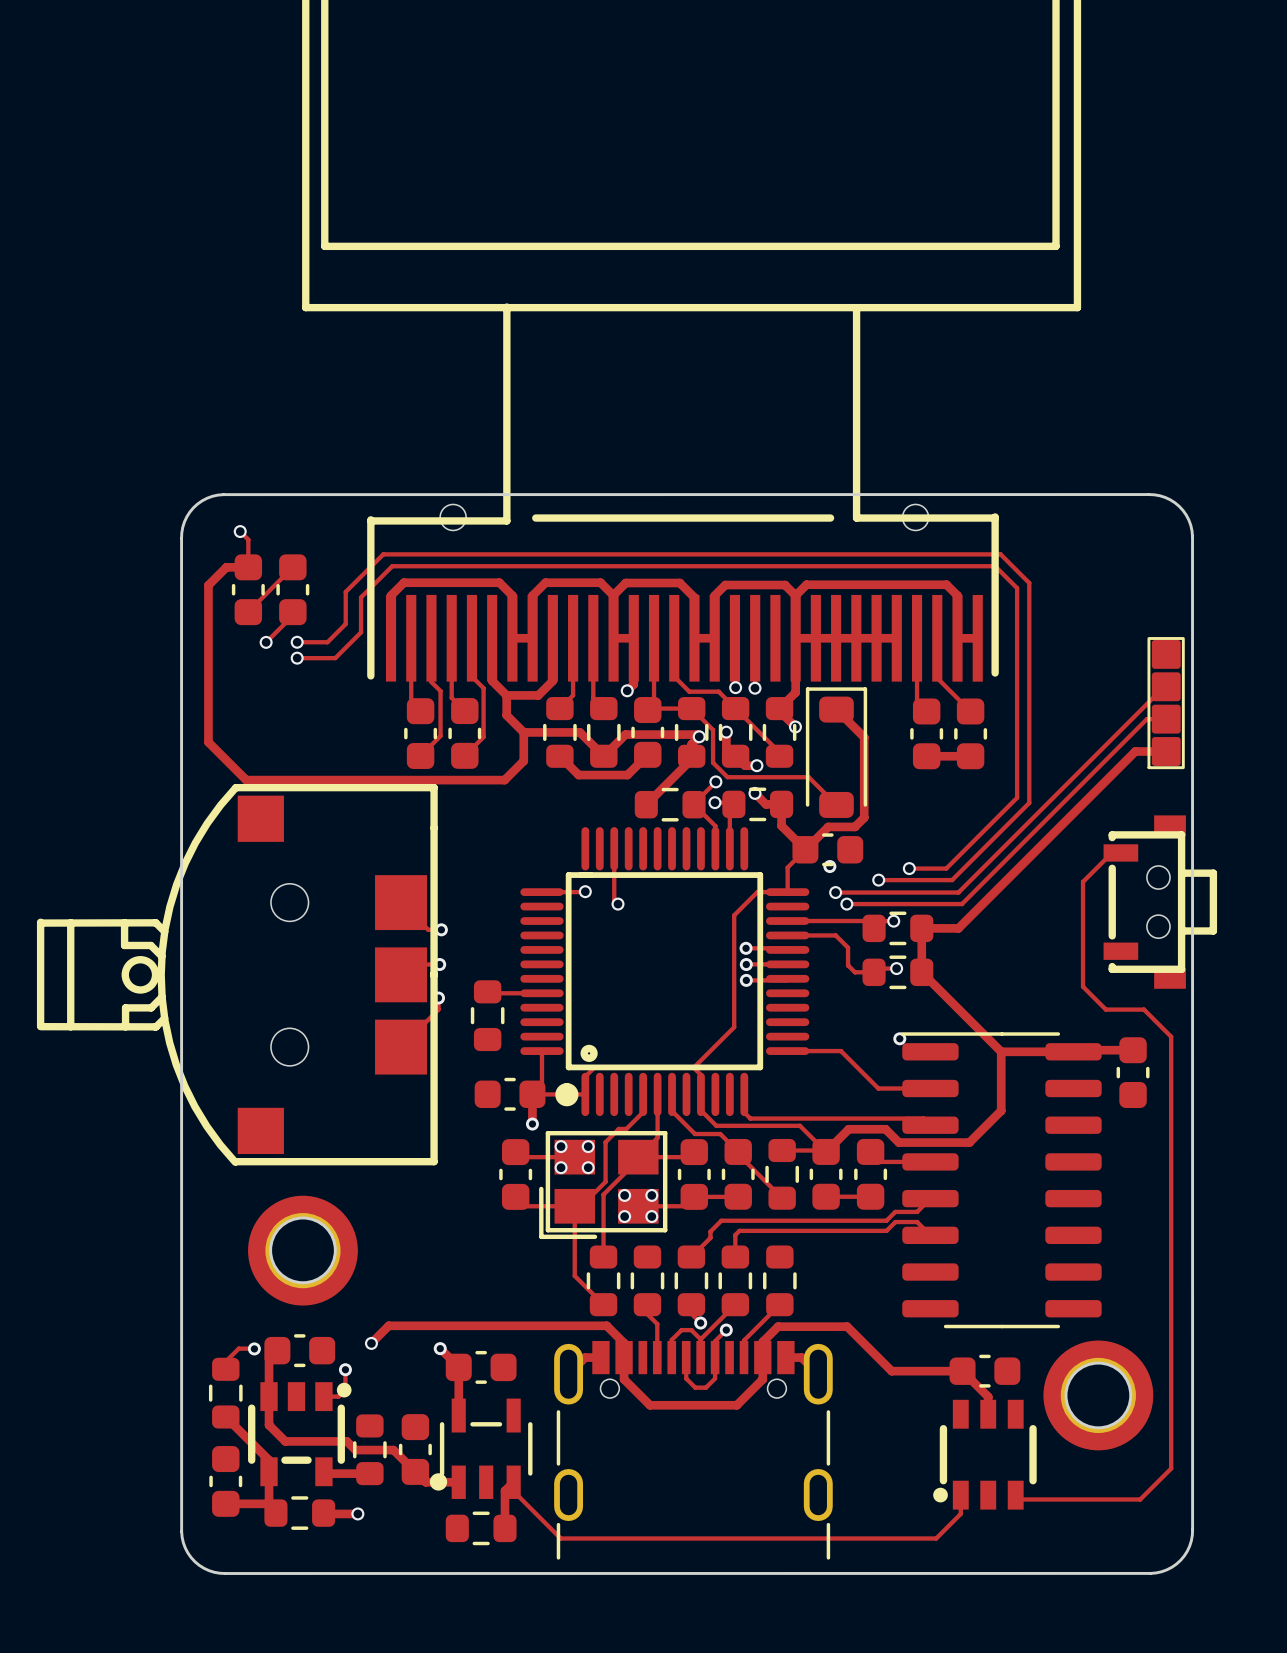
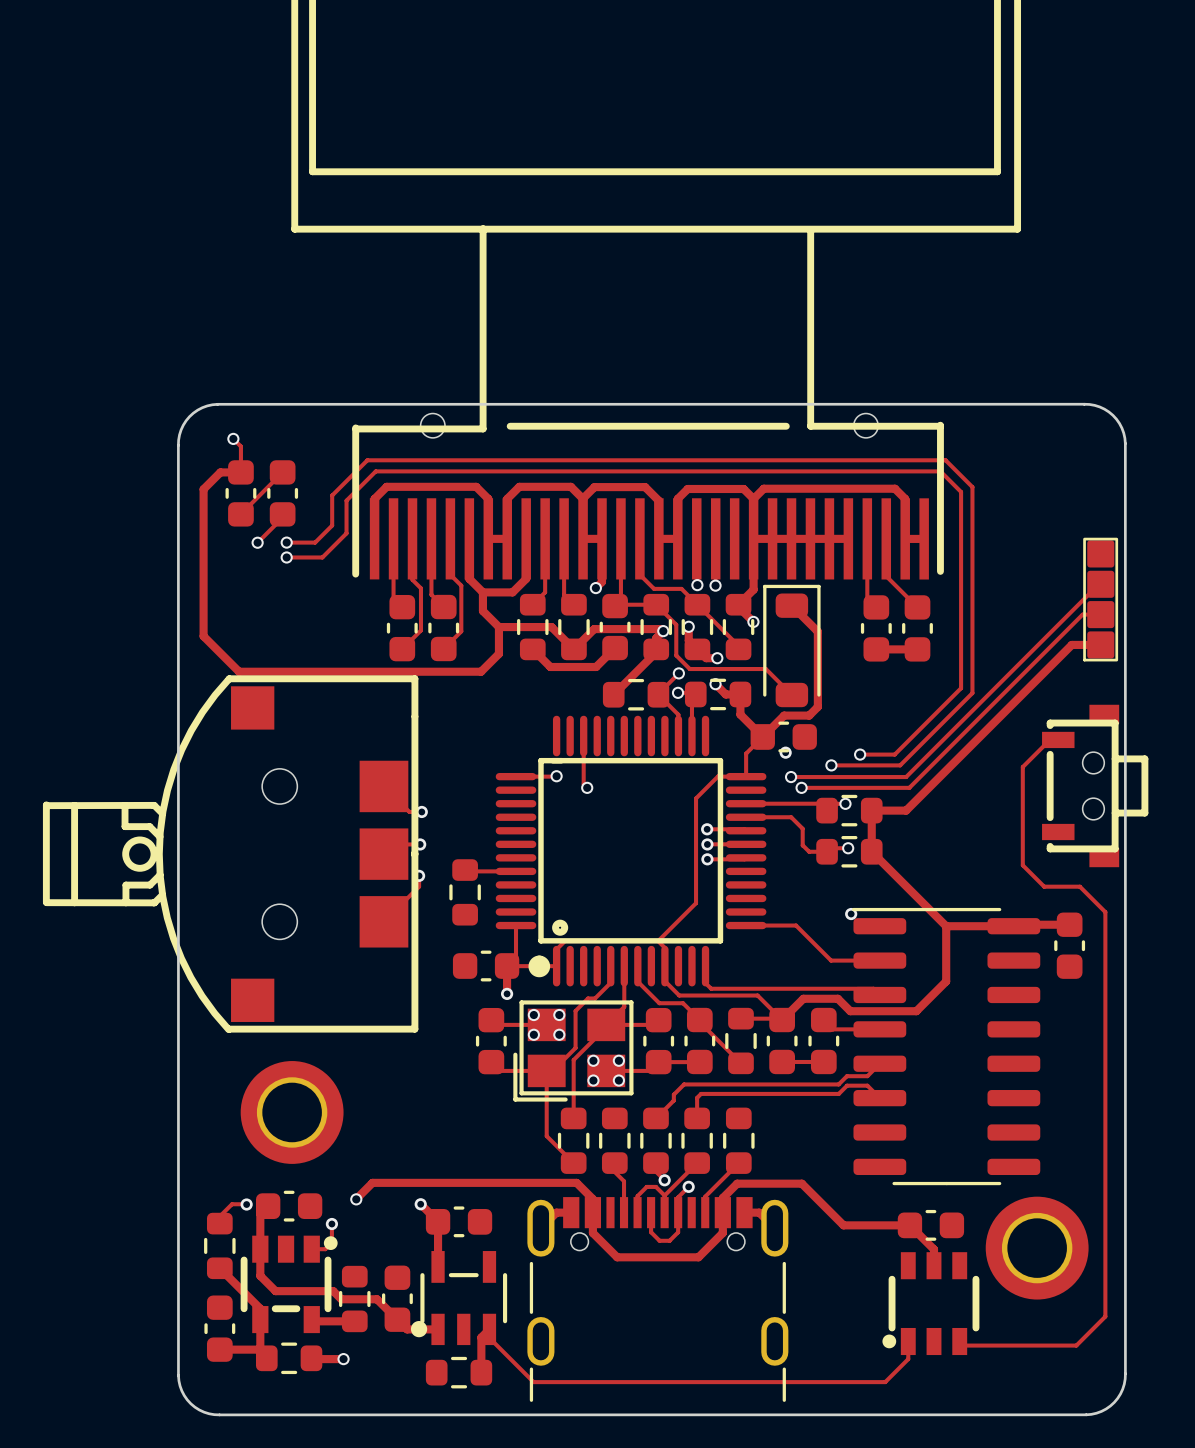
round board edge: [269, 1216, 337, 1285] -> none
round board edge: [1064, 1361, 1133, 1430] -> none

